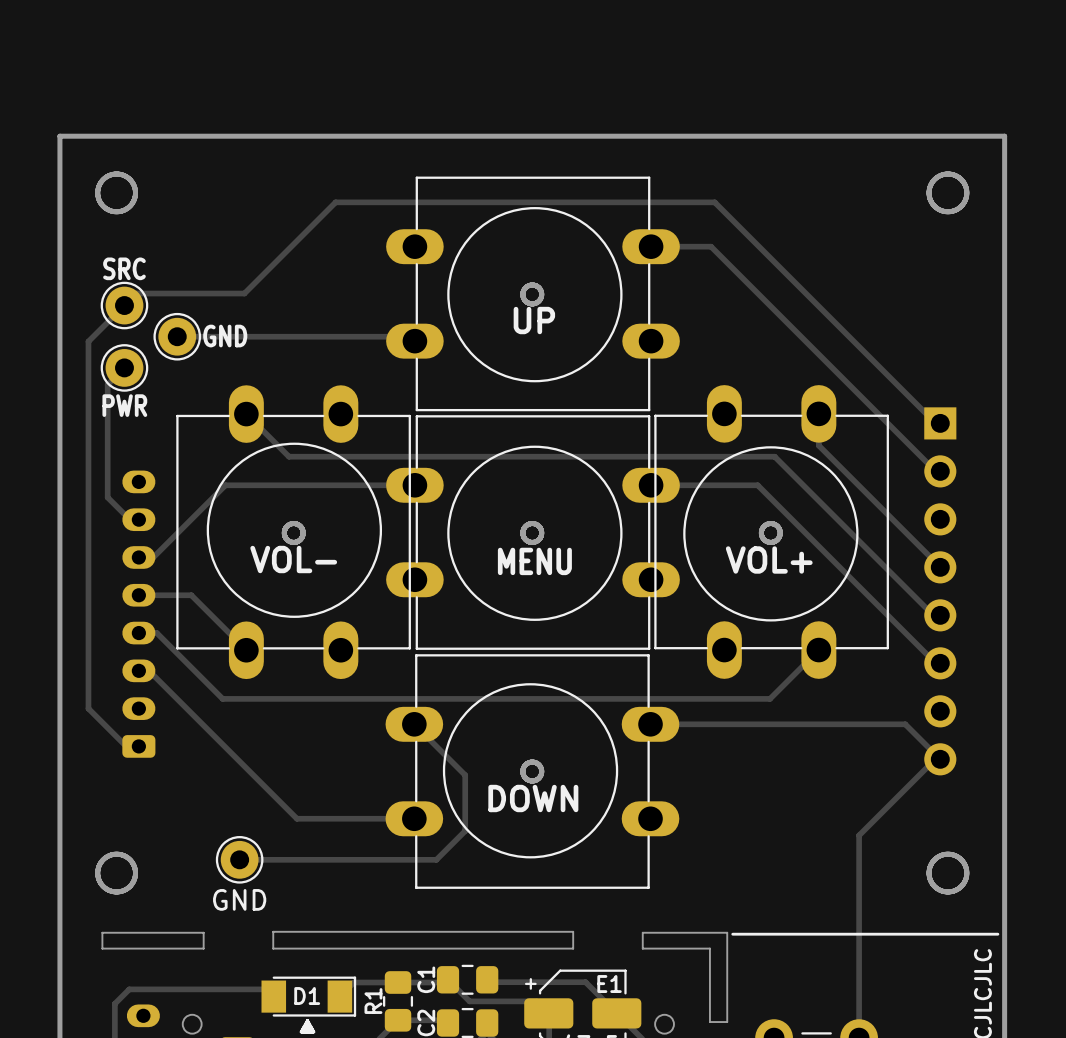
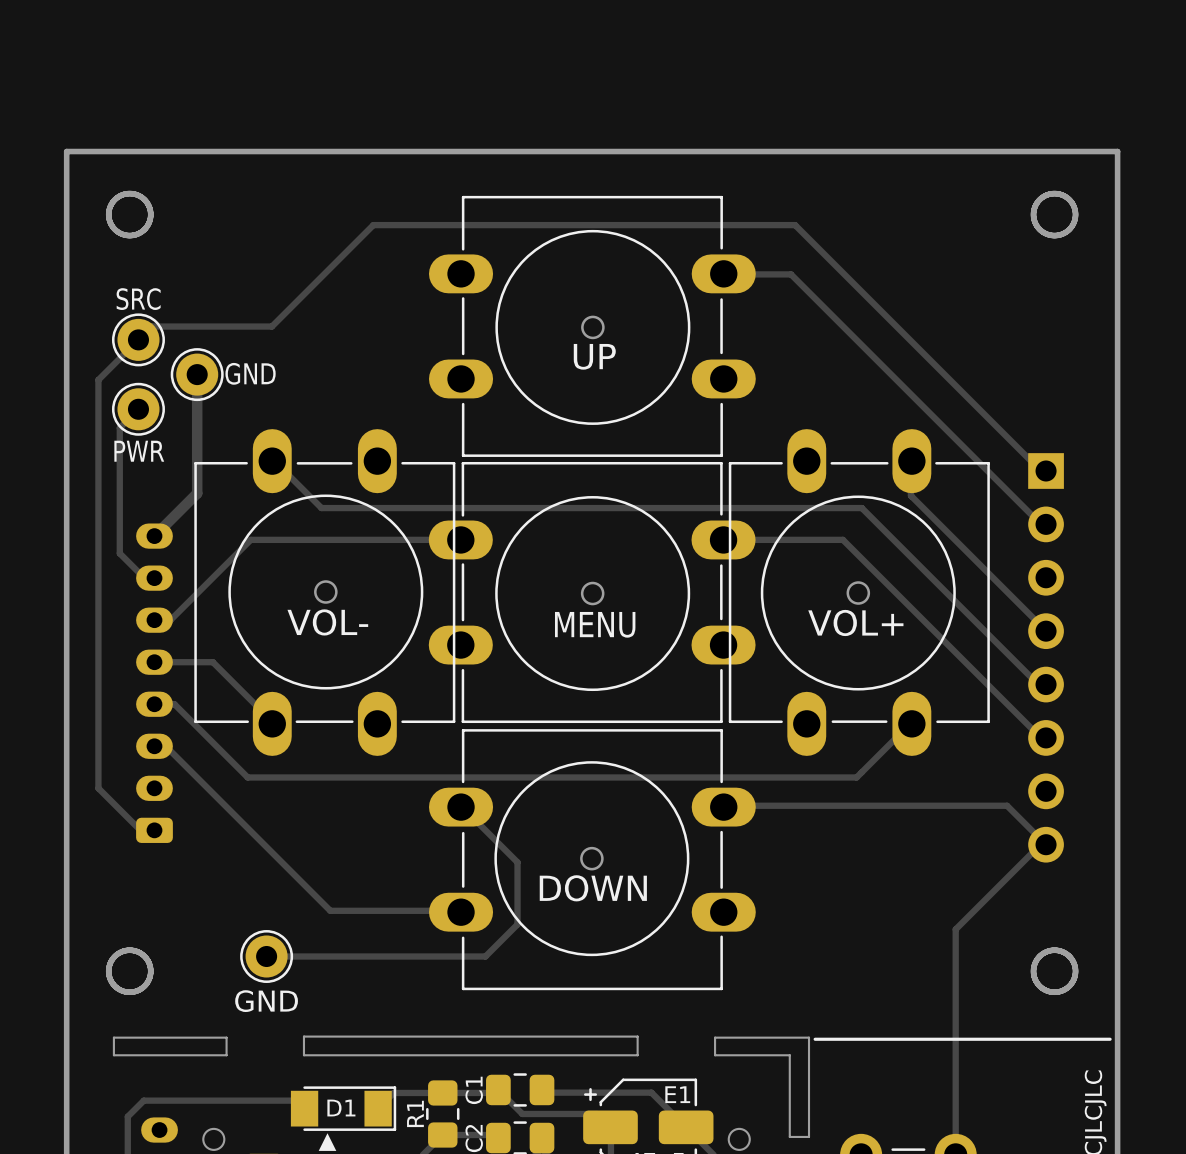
part footprint: [386, 176, 680, 412] -> [428, 195, 756, 457]
board edge: (531, 285) (538, 287) (541, 293) (539, 300) (533, 303) (526, 301) (522, 295) (524, 288) (531, 285) -> none
track: (177, 336) (409, 336) (414, 341) -> (197, 374) (197, 493) (154, 536)
part footprint: [176, 385, 411, 680] -> [194, 429, 456, 756]
part footprint: [654, 385, 889, 679] -> [728, 429, 990, 756]
part footprint: [386, 415, 680, 650] -> [428, 461, 756, 724]
board edge: (292, 523) (286, 527) (284, 534) (288, 540) (295, 542) (301, 538) (303, 531) (299, 525) (292, 523) -> none
board edge: (530, 523) (524, 527) (522, 534) (526, 540) (533, 542) (539, 538) (541, 531) (537, 525) (530, 523) -> none
board edge: (769, 523) (776, 525) (780, 531) (778, 538) (772, 542) (765, 540) (761, 534) (763, 527) (769, 523) -> none
part footprint: [385, 654, 680, 889] -> [428, 729, 756, 991]
board edge: (531, 762) (538, 764) (541, 770) (539, 777) (533, 780) (526, 778) (522, 772) (524, 765) (531, 762) -> none

